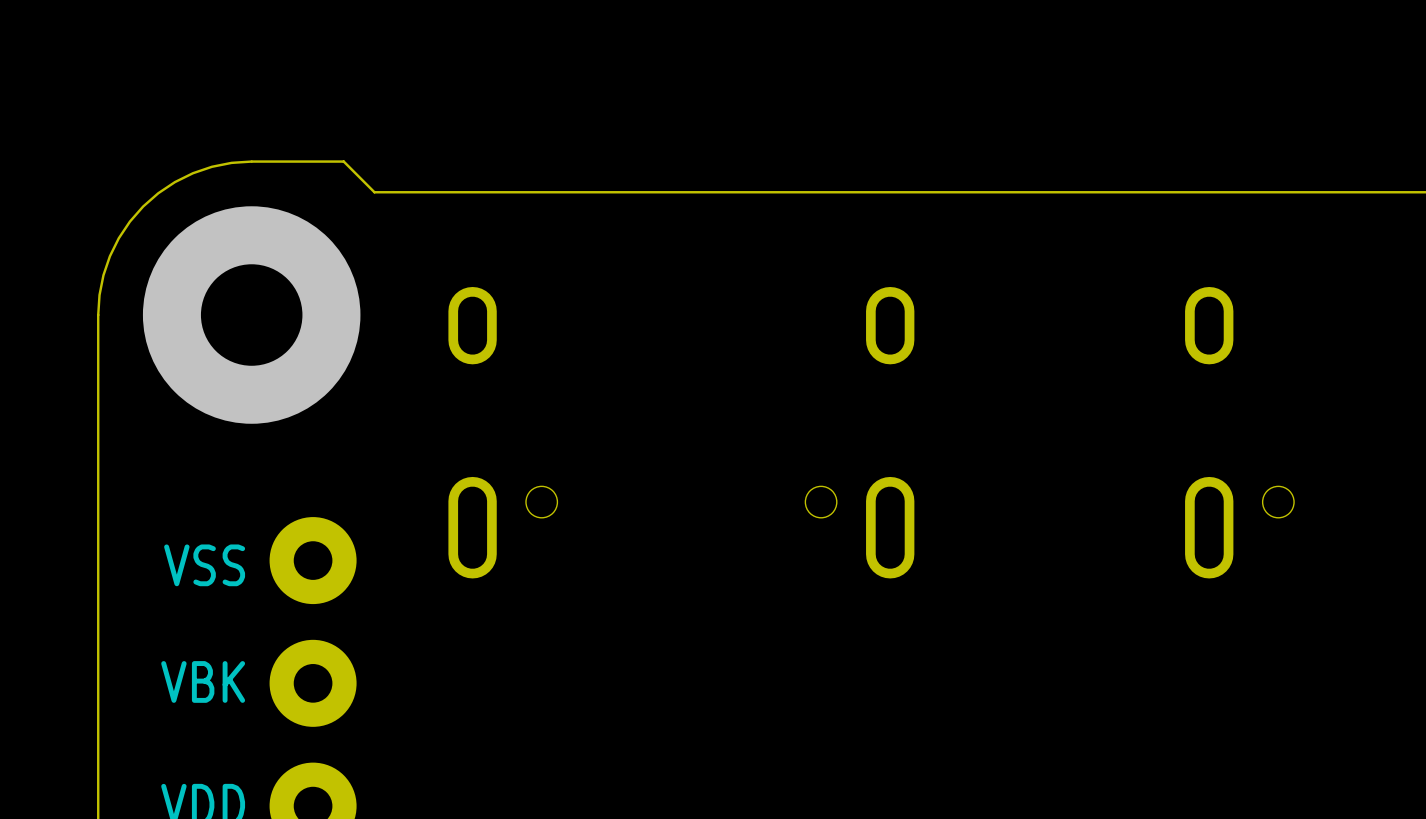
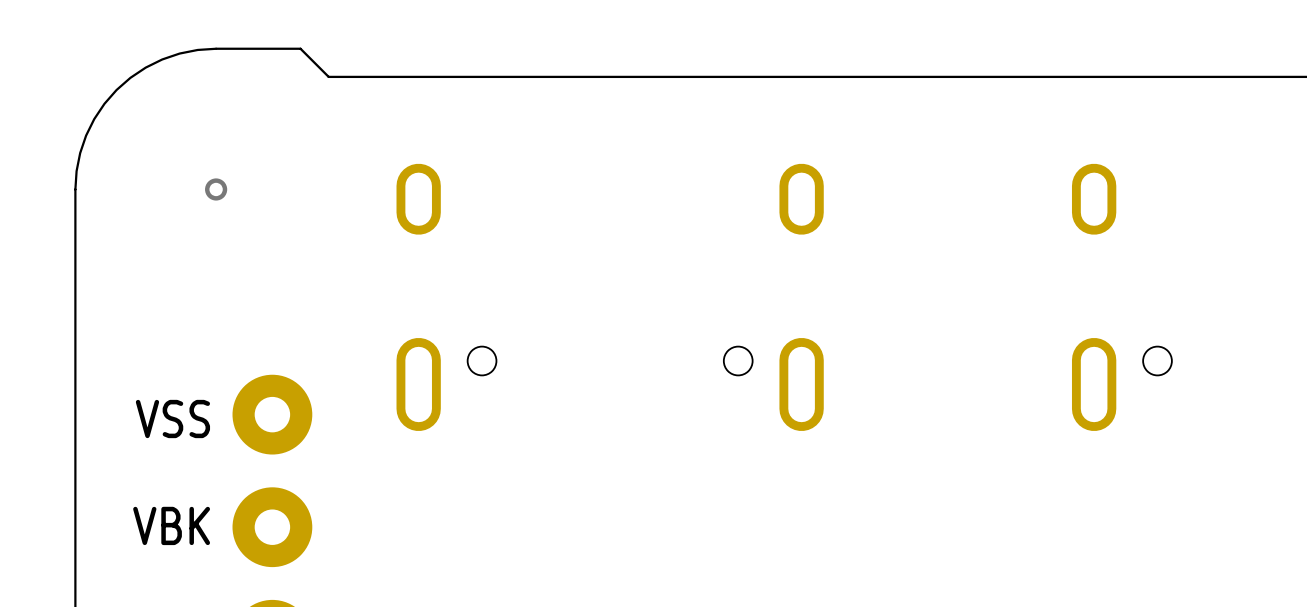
via size: [142, 206, 361, 424] -> [205, 178, 228, 201]

